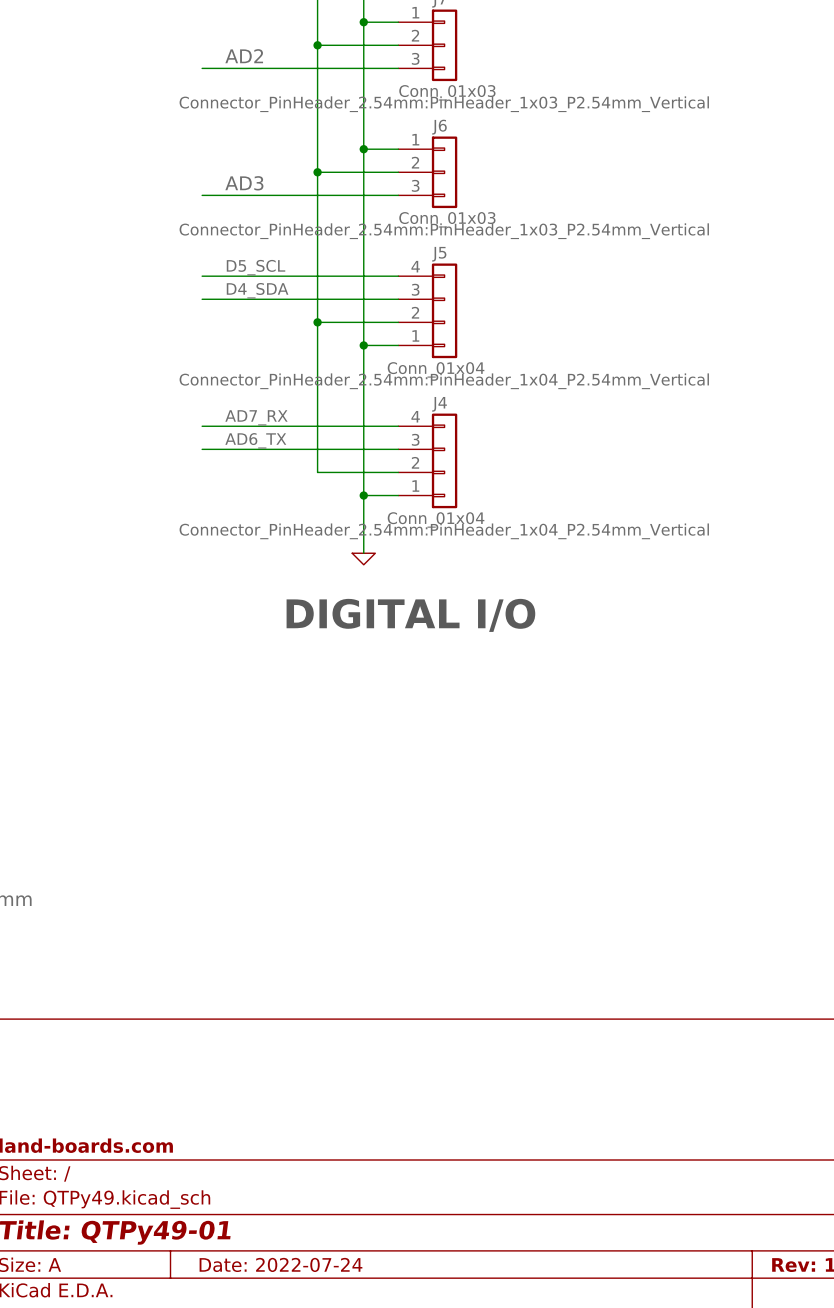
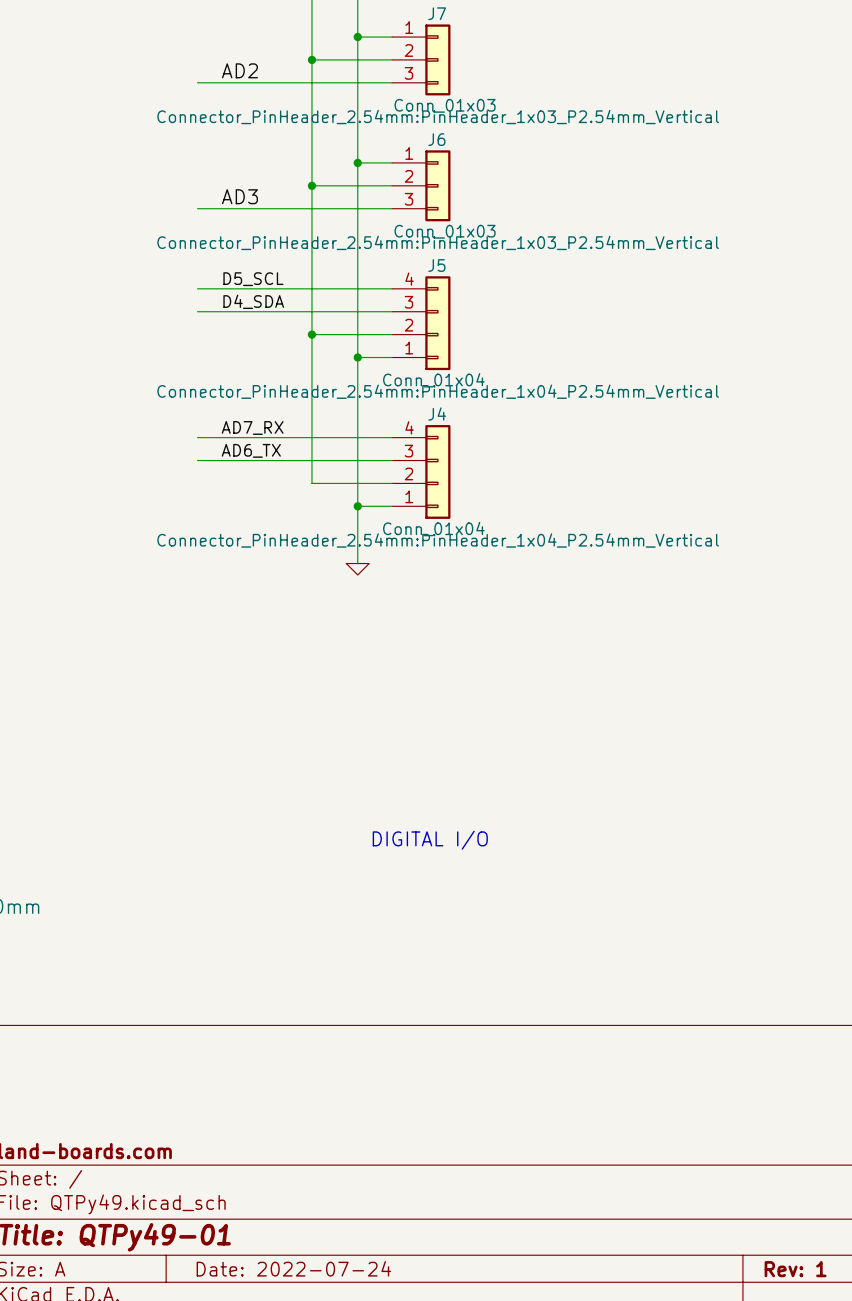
text: DIGITAL I/O (410, 615) -> none
text: none -> DIGITAL I/O (430, 840)

